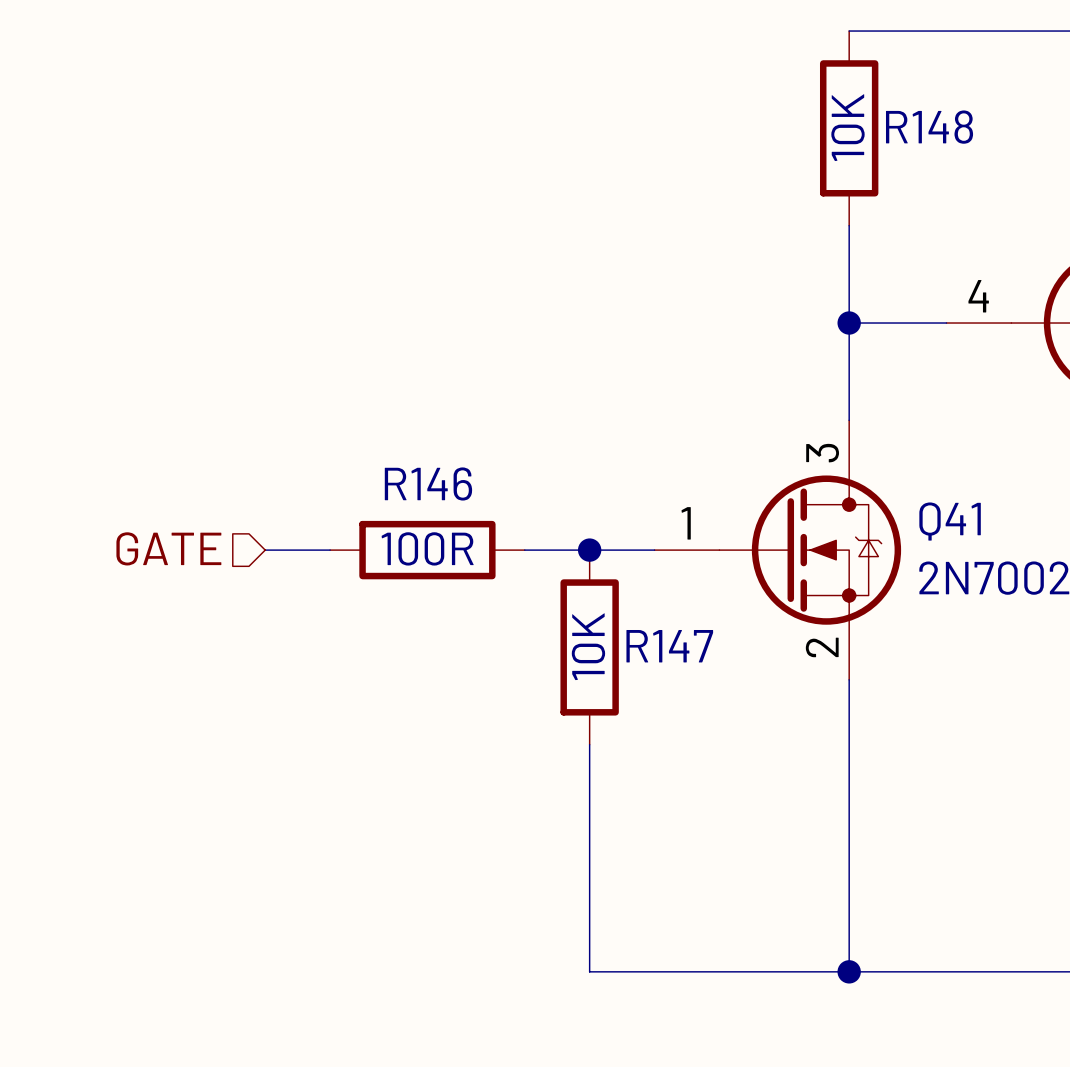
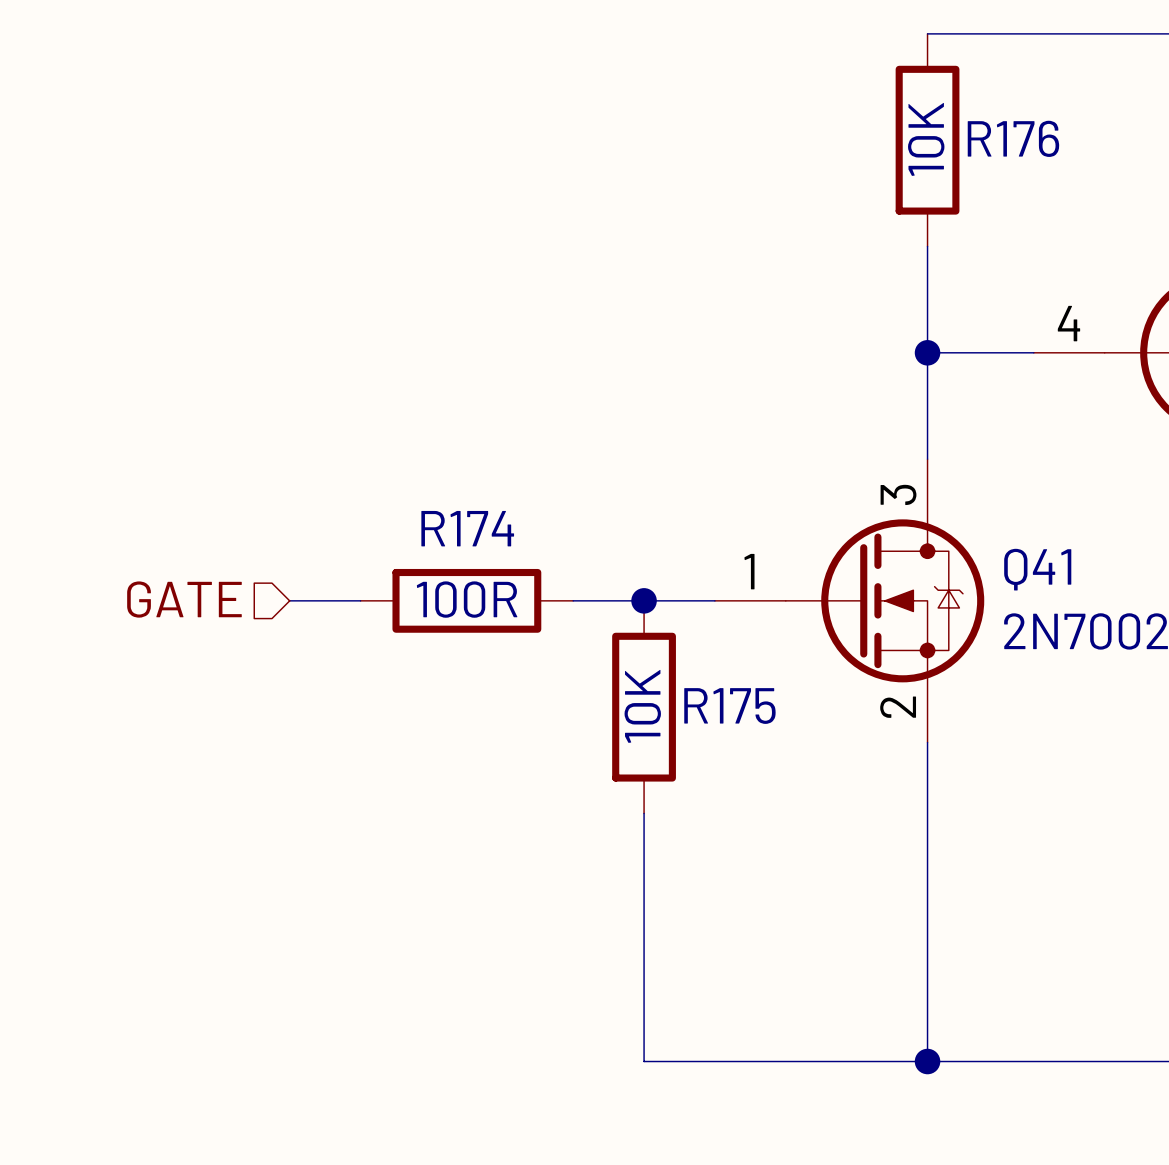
R148 name: R148 (929, 127) -> R176 (1013, 138)
R146 name: R146 (428, 483) -> R174 (467, 528)
R147 name: R147 (669, 646) -> R175 (729, 706)

